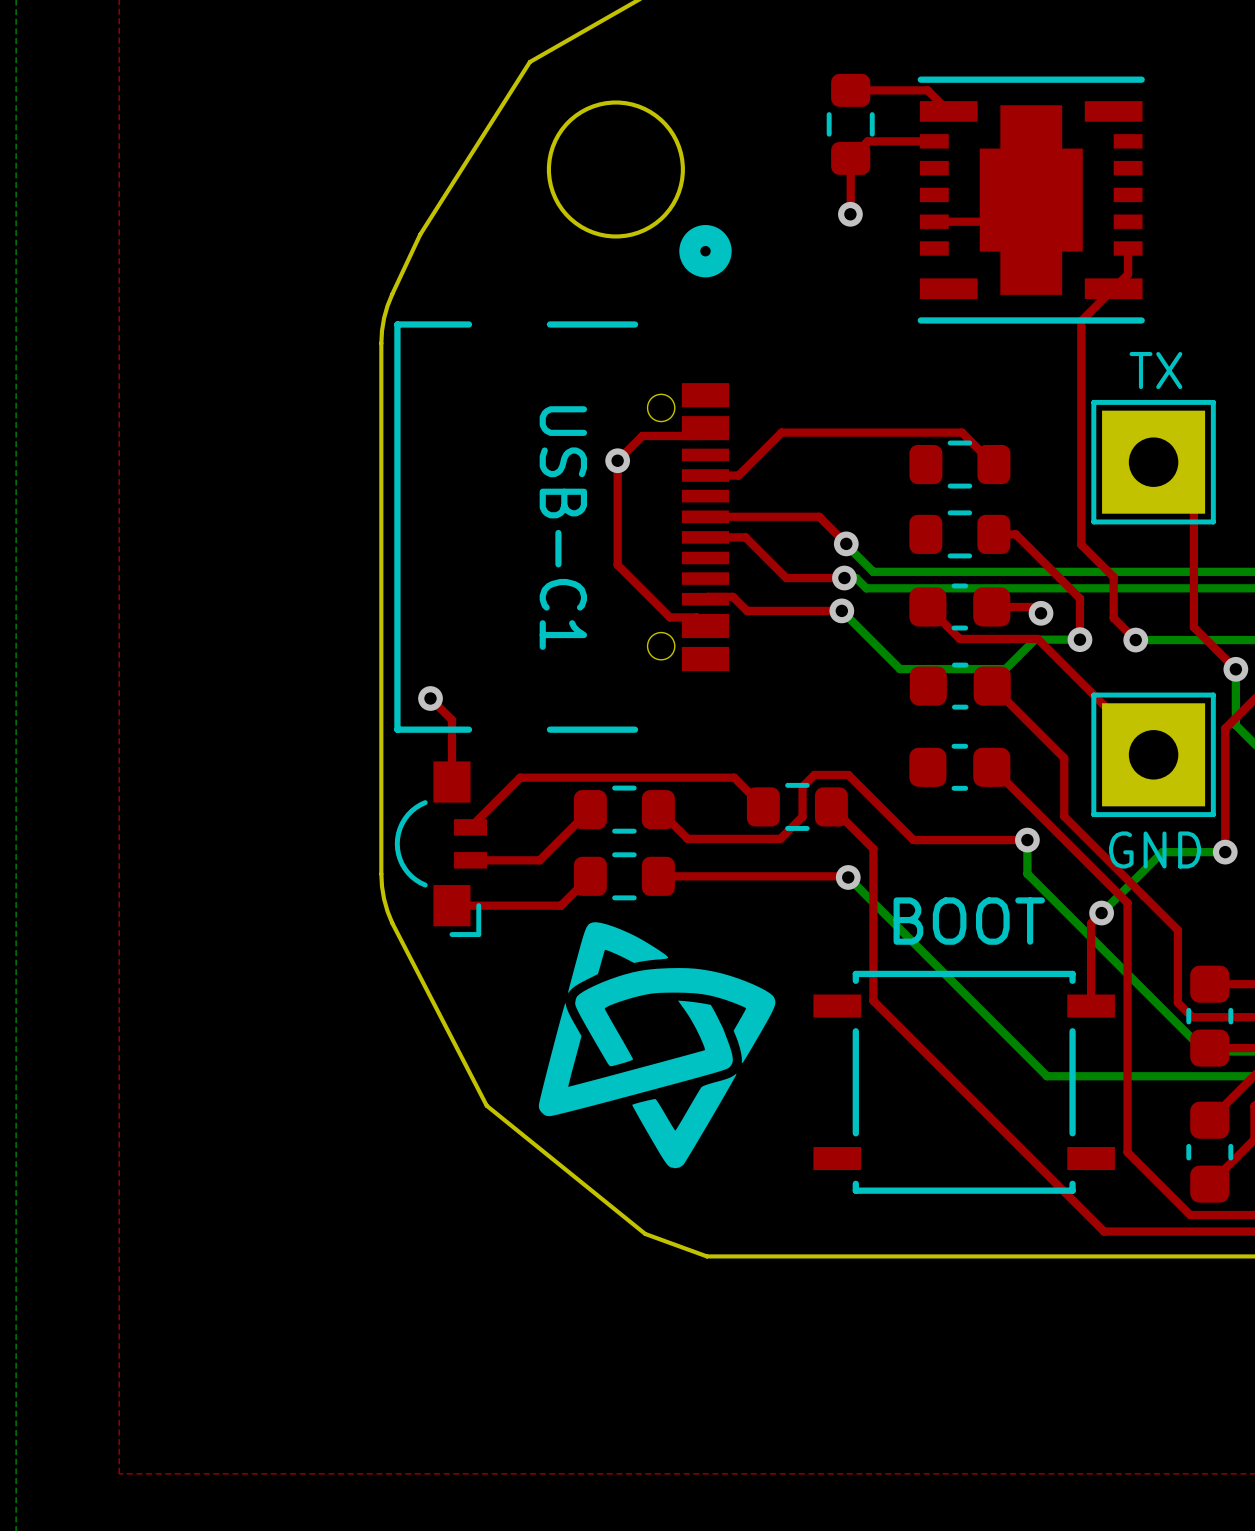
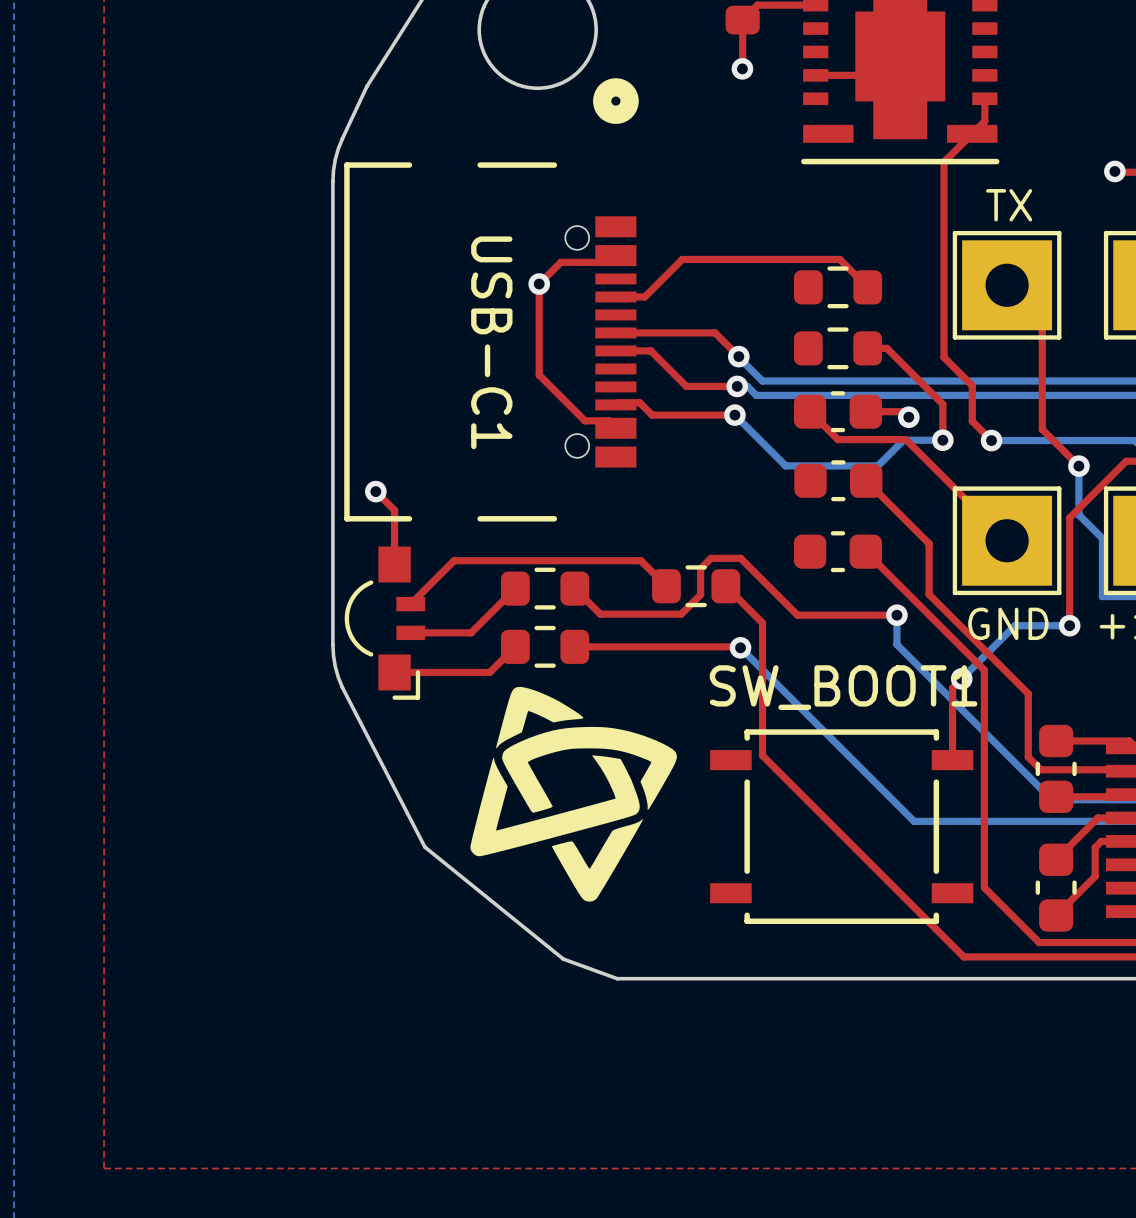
BOOT name: BOOT (969, 921) -> SW_BOOT1 (843, 687)

